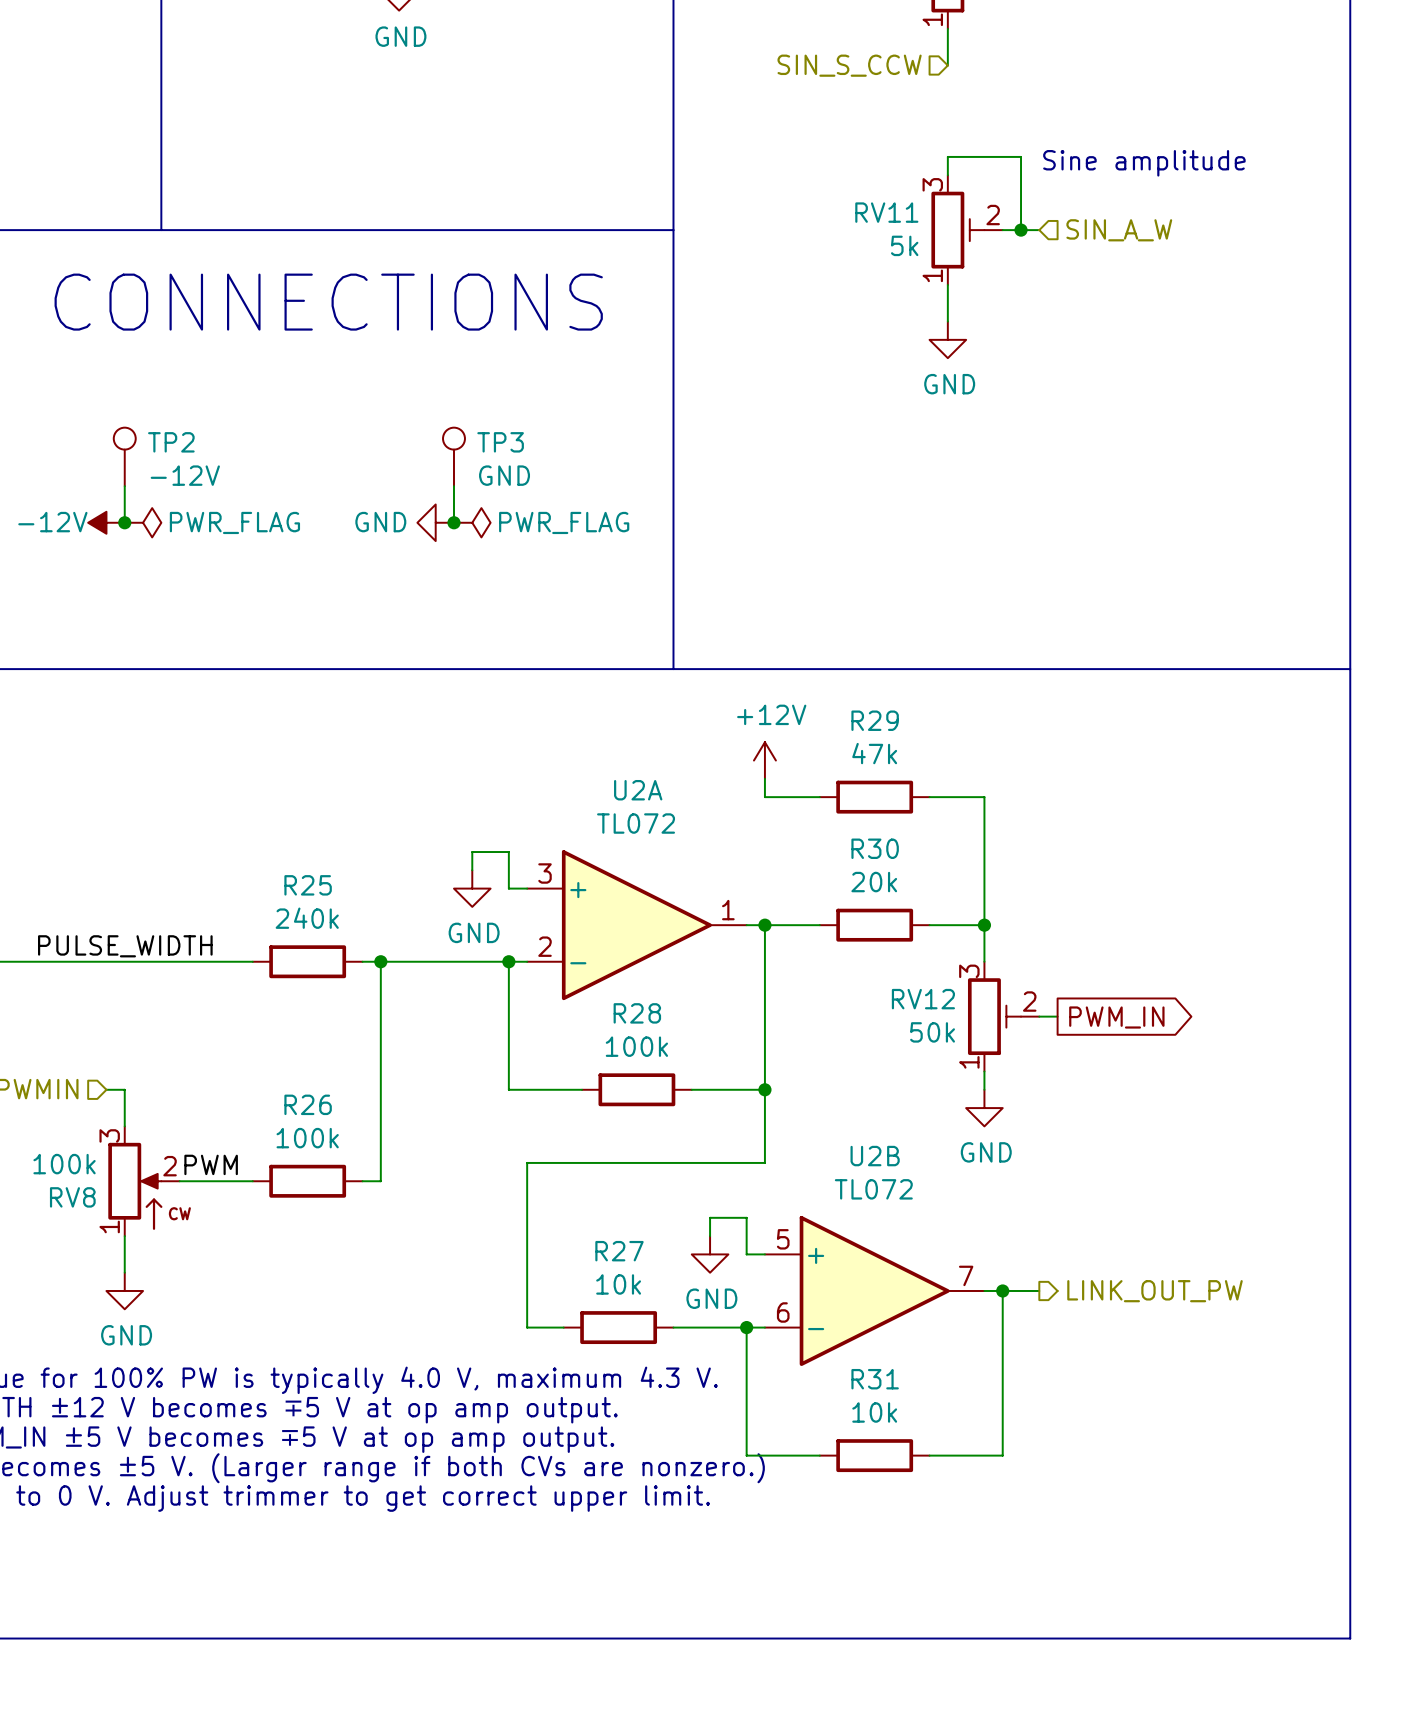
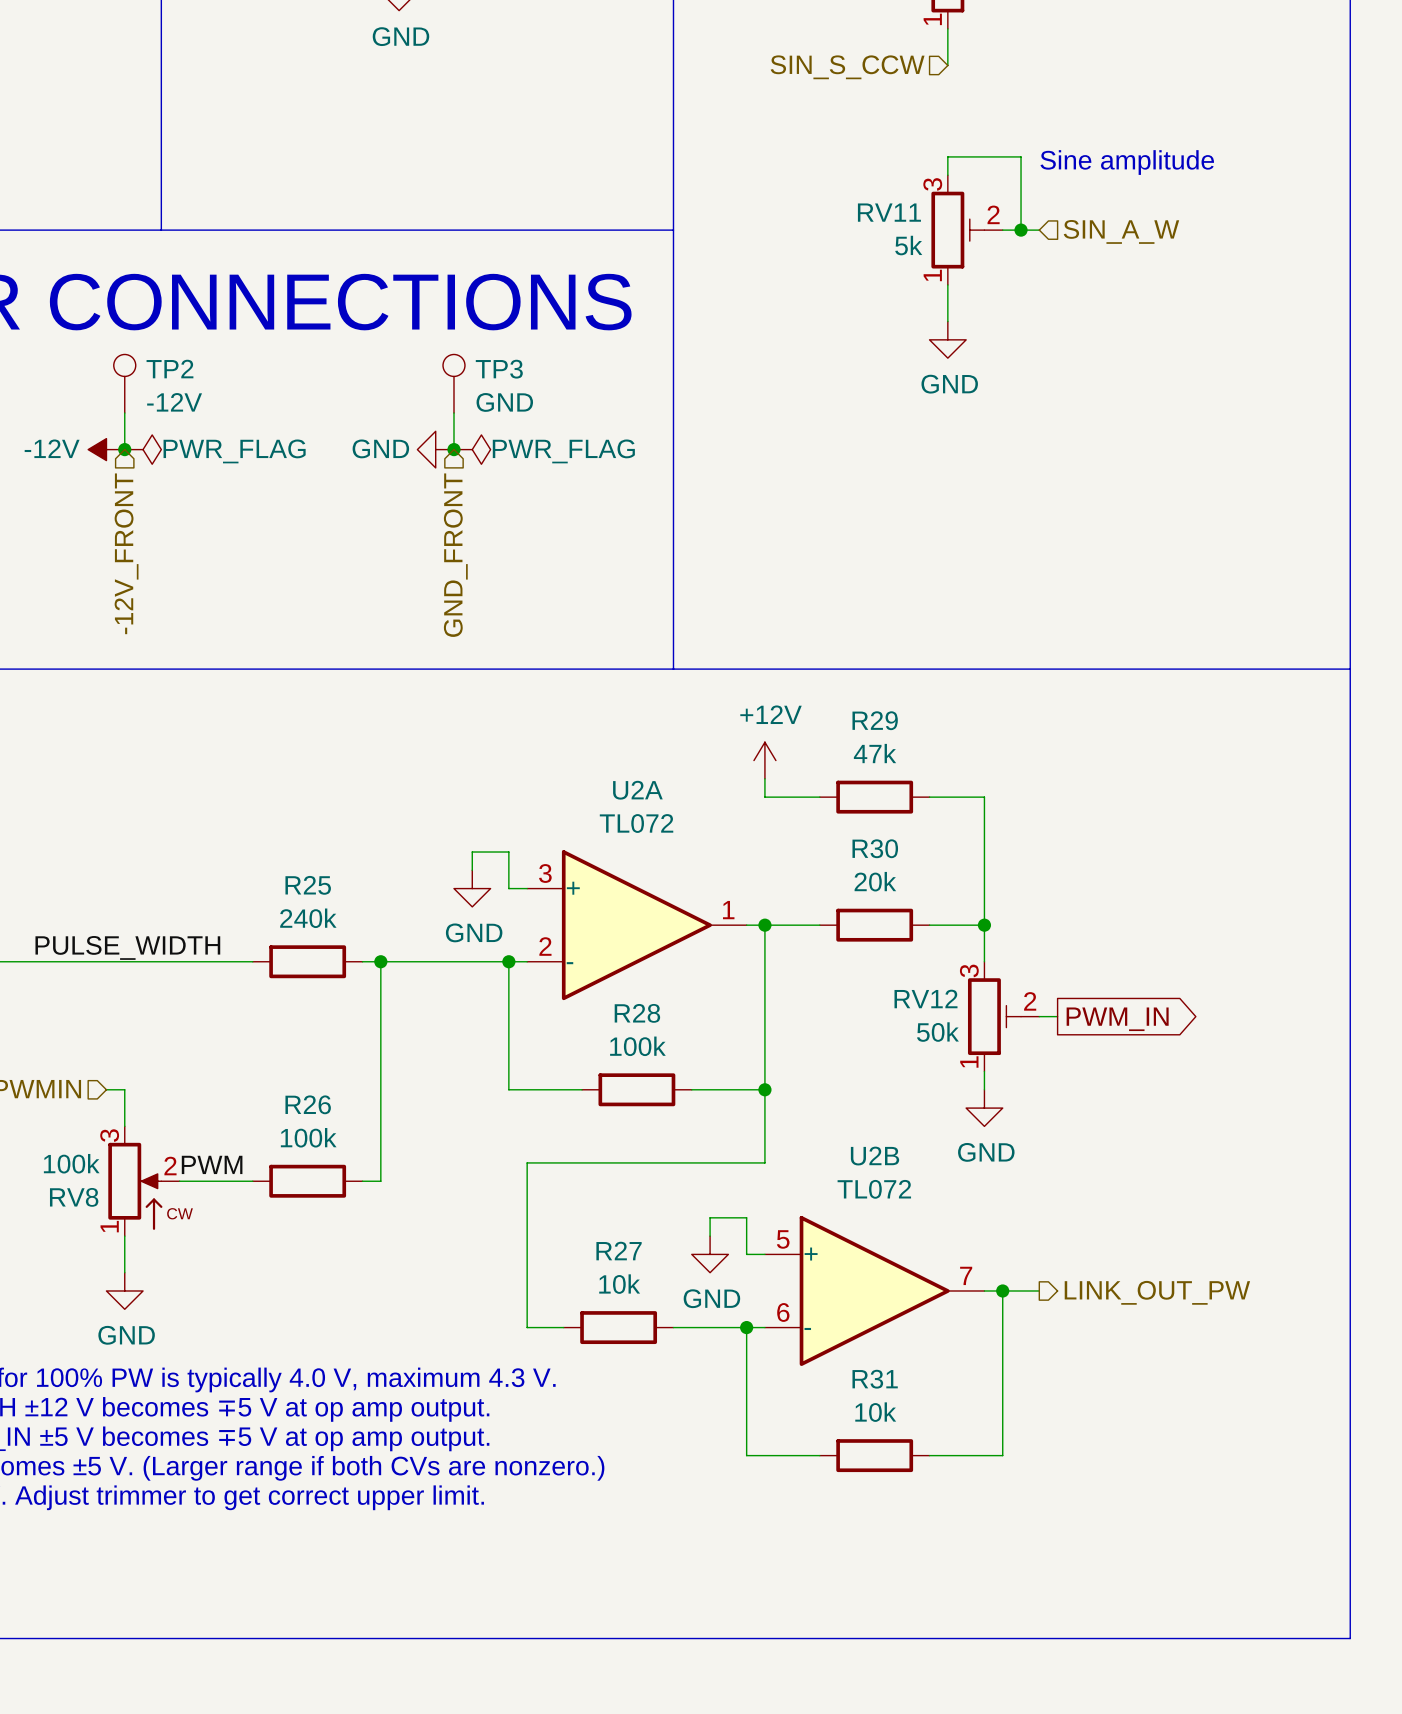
TP2 position: (124, 456) -> (124, 383)
TP3 position: (453, 456) -> (453, 383)
wire: (124, 486) (124, 522) -> (124, 413) (124, 449)
wire: (453, 486) (453, 522) -> (453, 413) (453, 449)
power symbol position: -12V (106, 522) -> -12V (106, 449)
junction position: (124, 522) -> (124, 449)
power symbol position: PWR_FLAG (143, 522) -> PWR_FLAG (143, 449)
power symbol position: GND (435, 522) -> GND (435, 449)
junction position: (453, 522) -> (453, 449)
power symbol position: PWR_FLAG (472, 522) -> PWR_FLAG (472, 449)
hierarchical label: none -> GND_FRONT (455, 555)
hierarchical label: none -> -12V_FRONT (126, 553)

